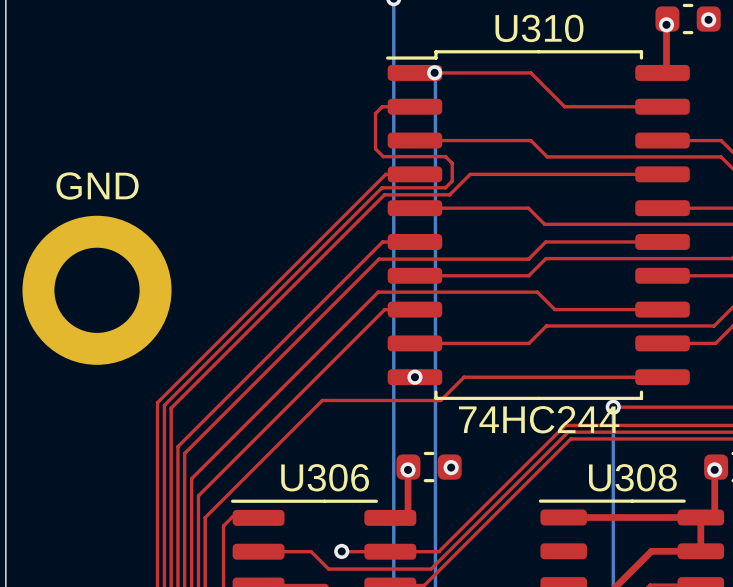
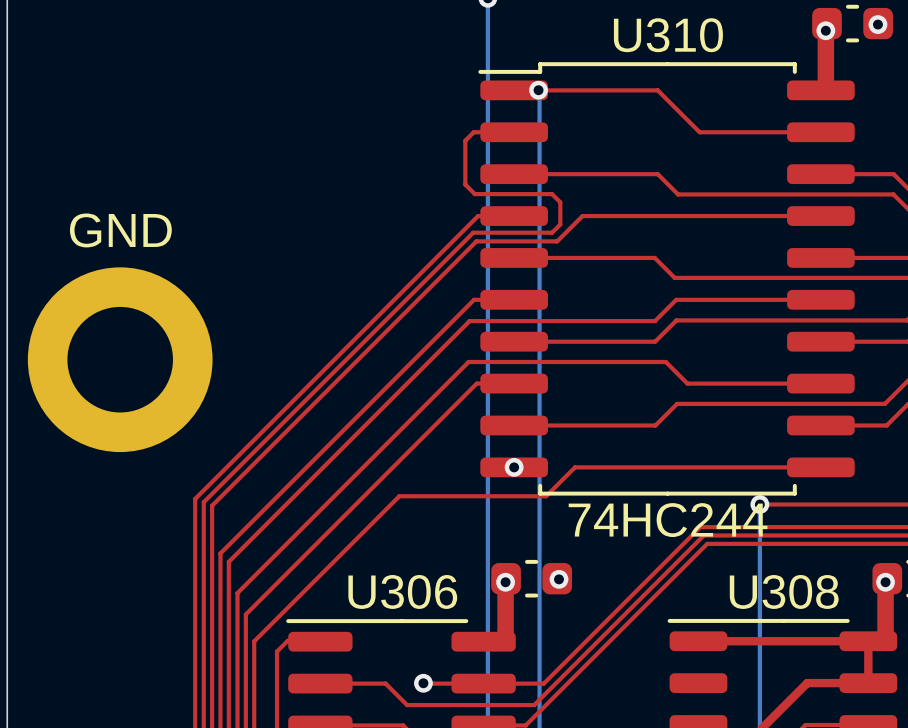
top track width: thin (666, 24) (666, 72) -> thick (825, 30) (825, 89)
top track width: thin (408, 469) (408, 517) -> thick (505, 582) (505, 641)
top track width: thin (714, 469) (714, 517) -> thick (885, 582) (885, 641)

